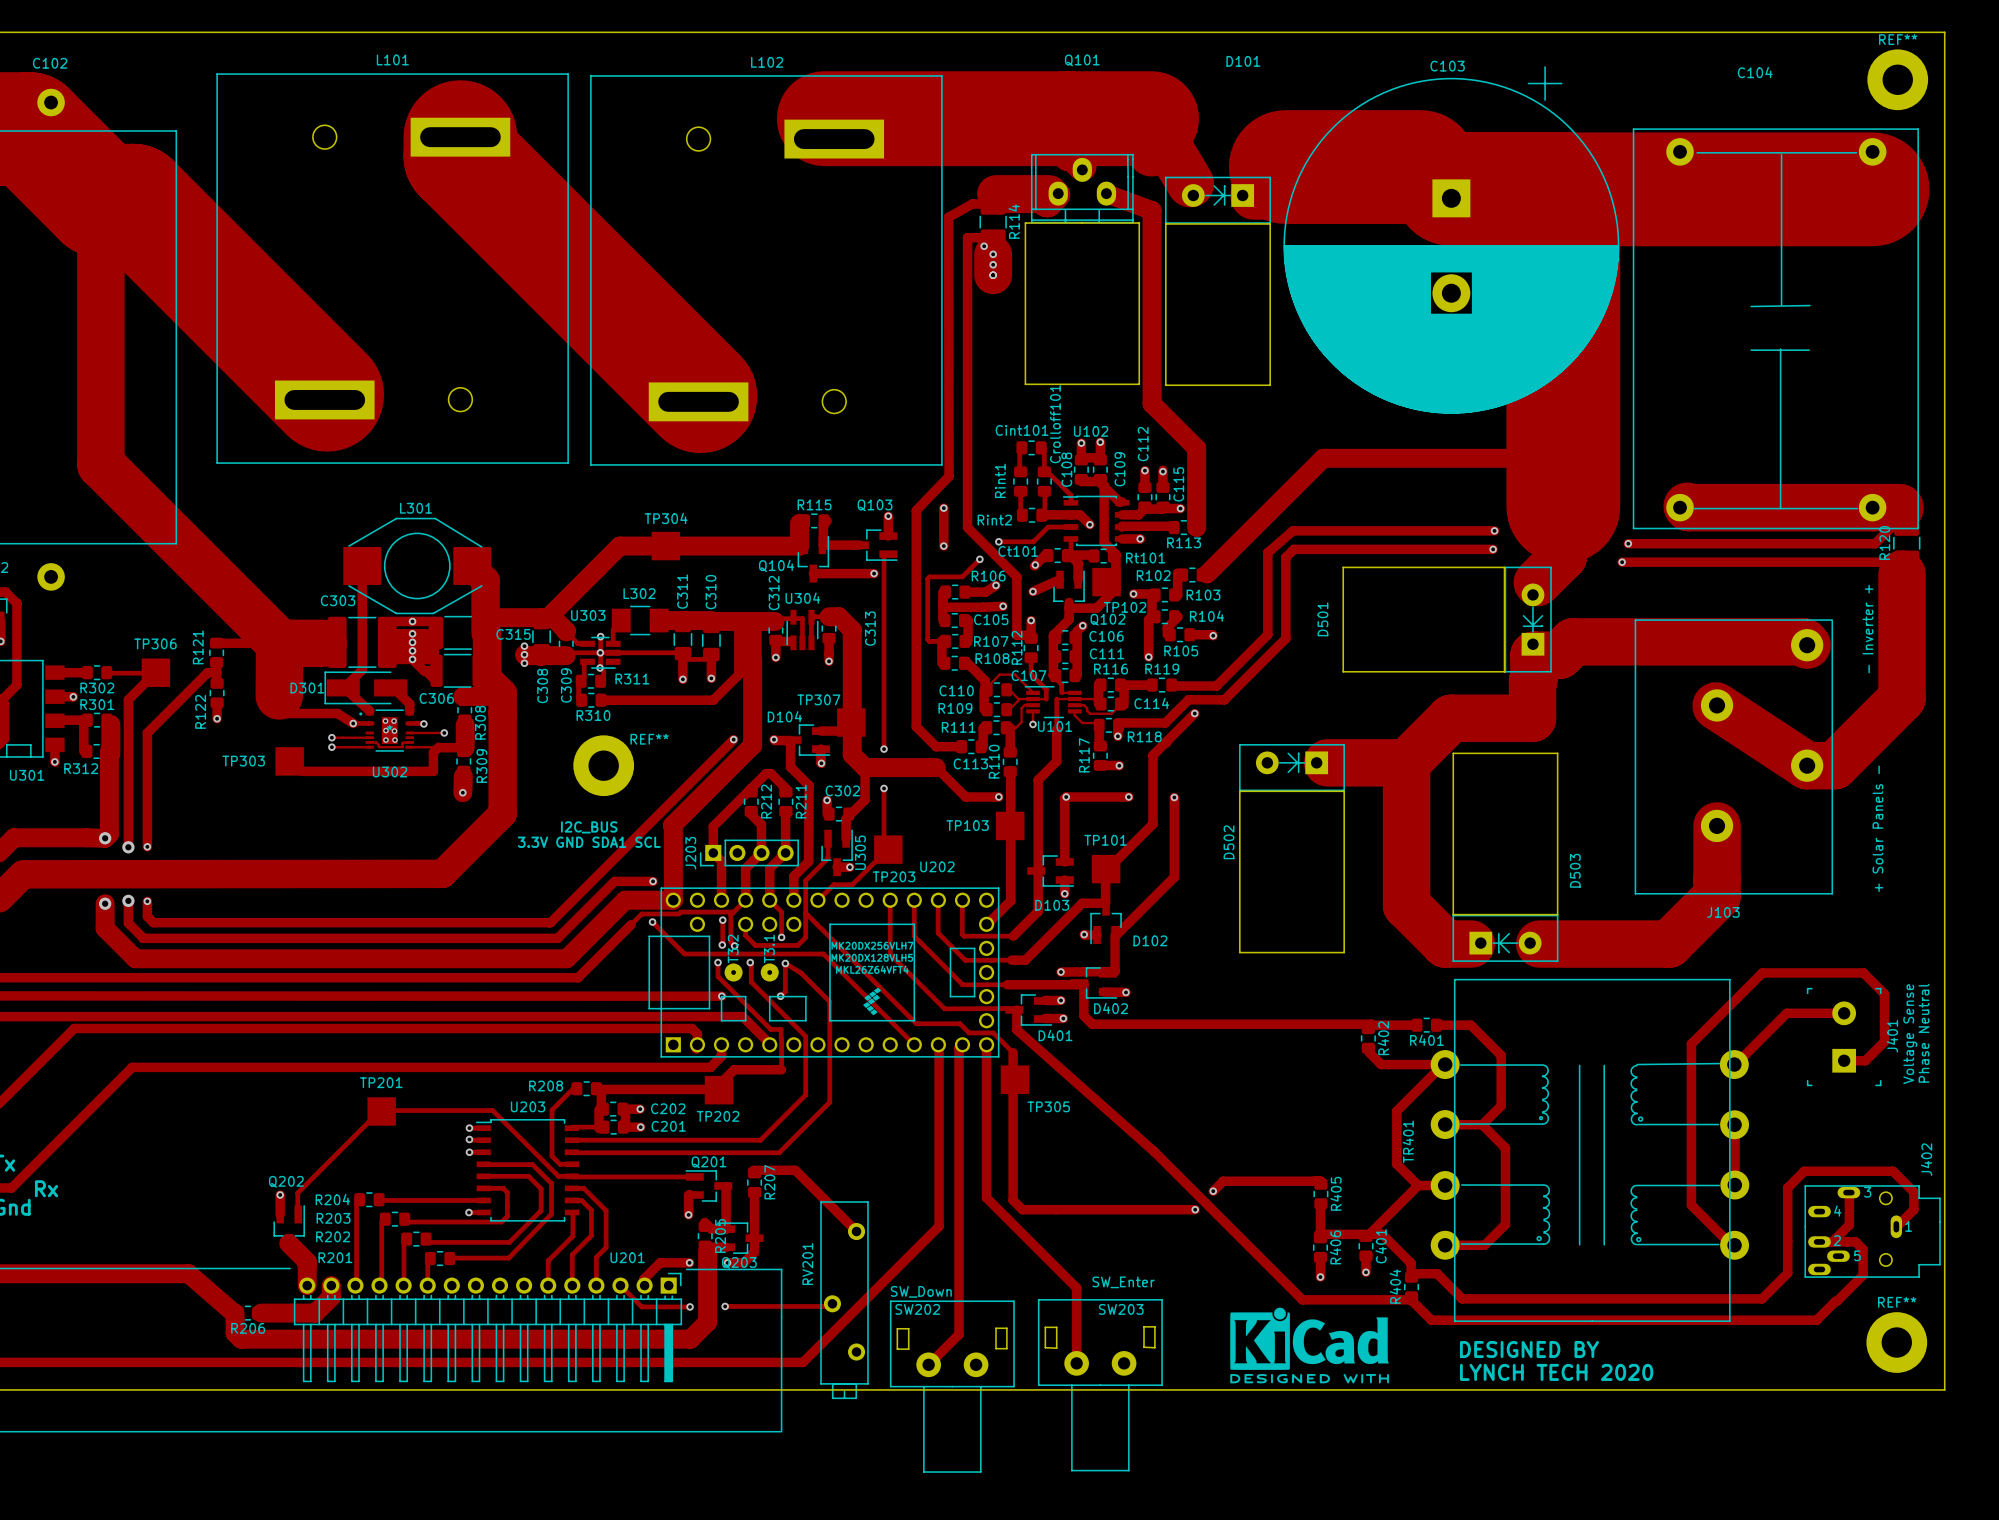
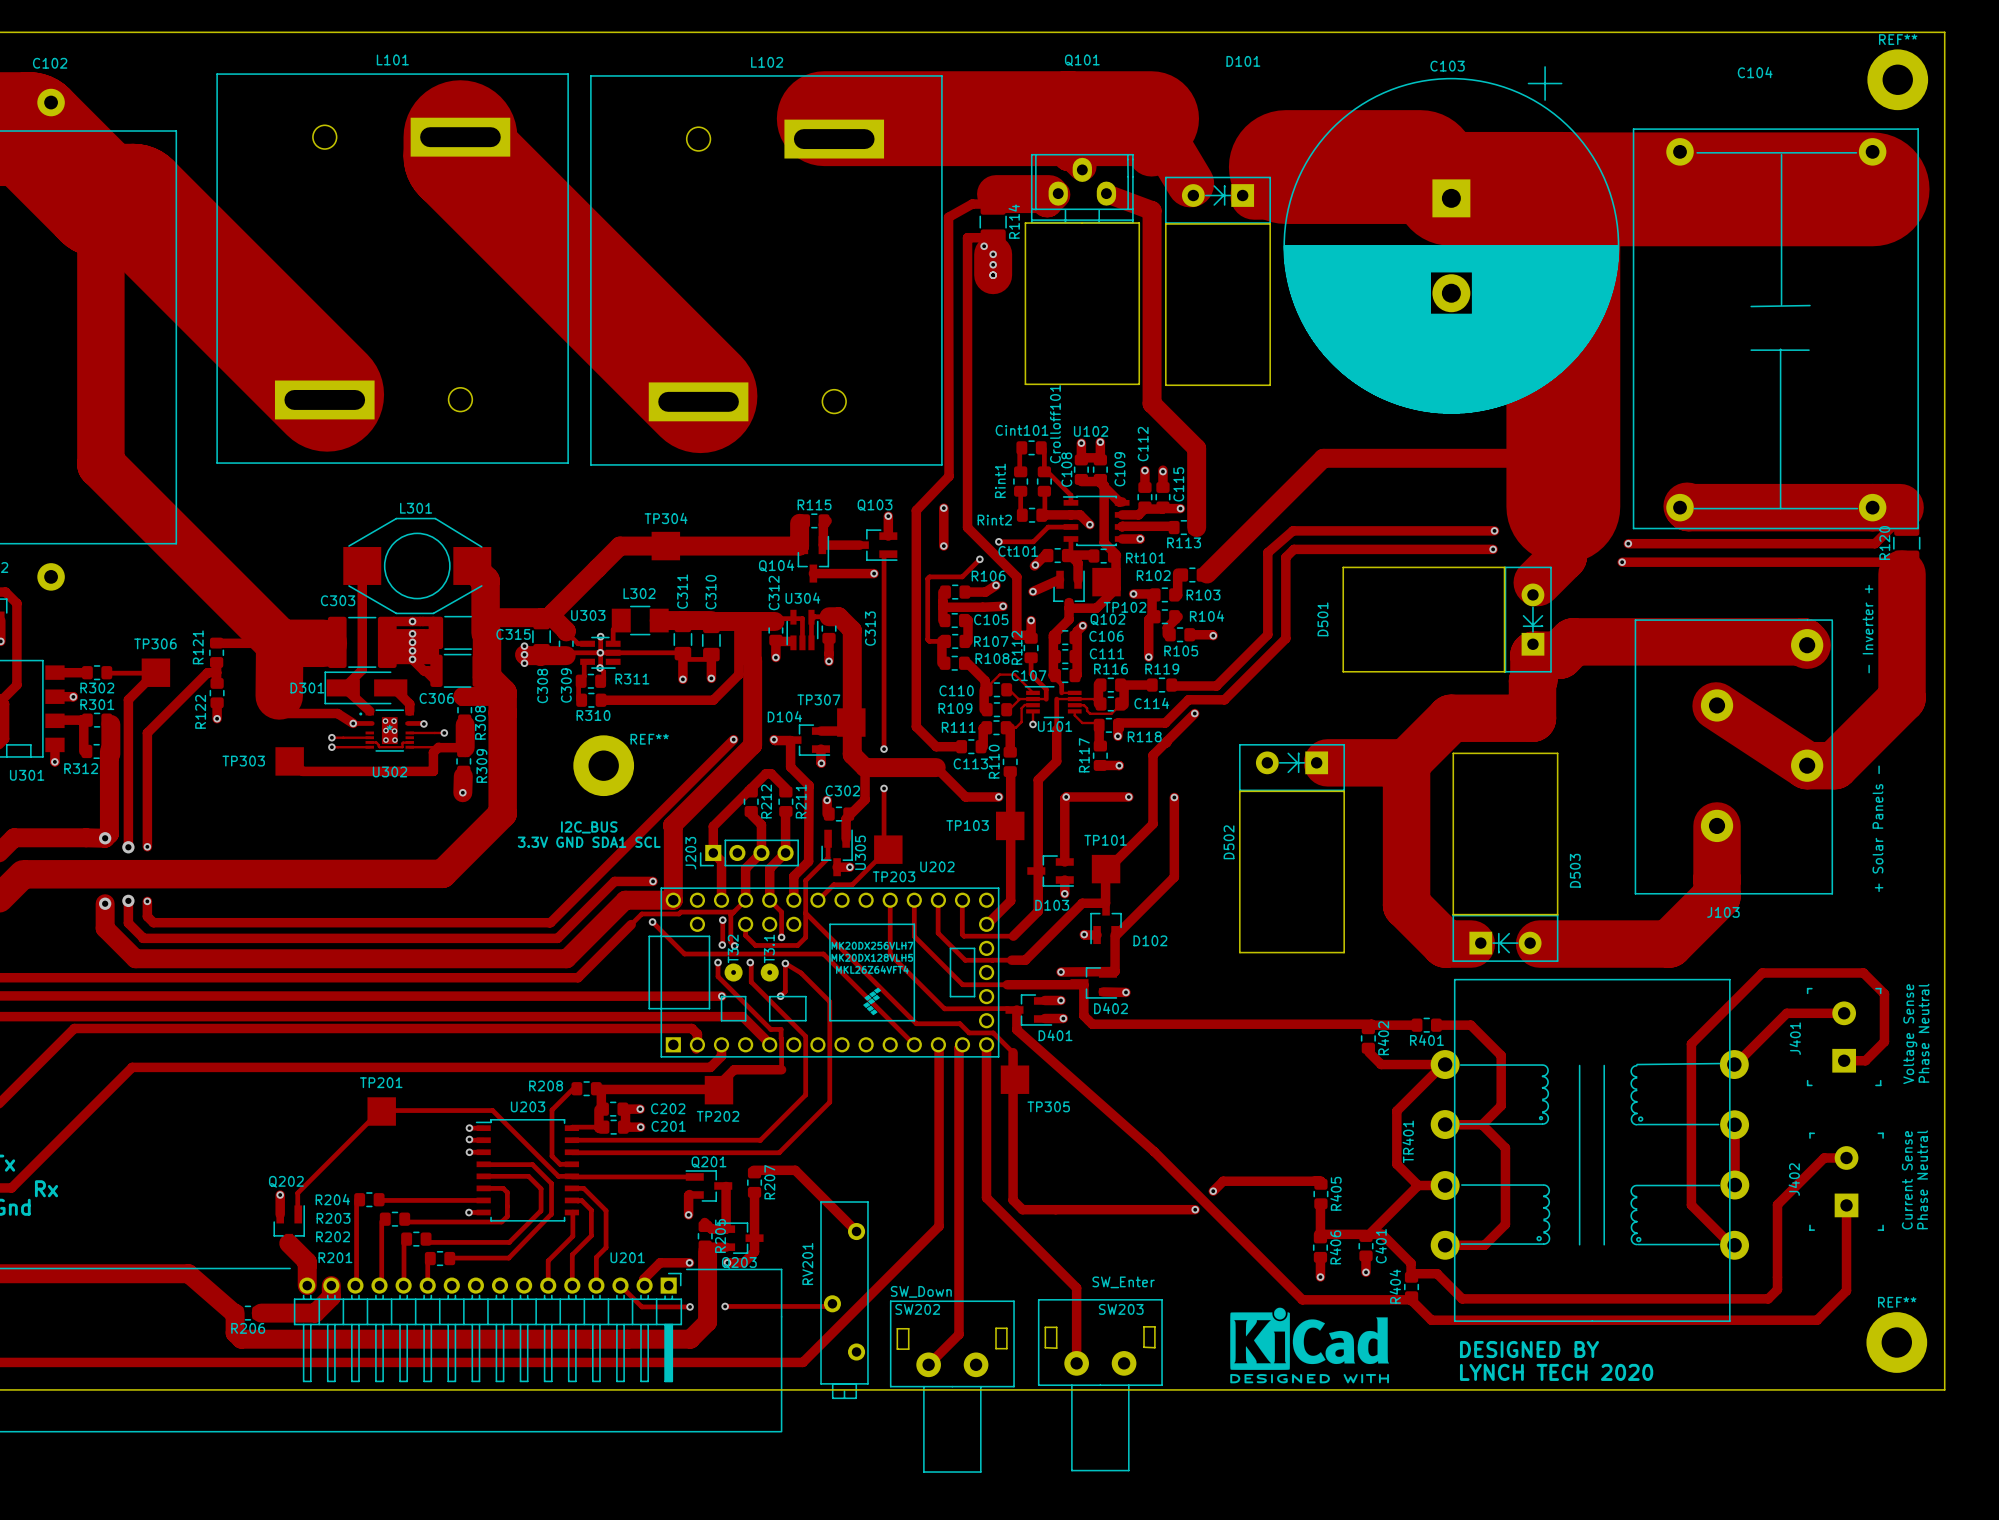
J401 name position: J401 (1892, 1036) -> J401 (1795, 1038)
J402 name position: J402 (1926, 1159) -> J402 (1794, 1179)
text: none -> Phase Neutral (1922, 1179)
text: none -> Current Sense (1907, 1180)
J402 footprint: [1804, 1185, 1941, 1278] -> [1809, 1132, 1884, 1231]
track: (1849, 1192) (1849, 1224) (1832, 1241) -> none
track: (1896, 1227) (1913, 1209) (1913, 1192) (1893, 1171) (1804, 1171) (1787, 1187) (1787, 1273) (1762, 1298) -> (1846, 1157) (1824, 1157) (1777, 1204) (1777, 1289) (1768, 1298) (1762, 1298)
track: (1819, 1241) (1855, 1241) (1863, 1249) (1863, 1275) (1816, 1320) -> (1846, 1204) (1846, 1290) (1816, 1320)

